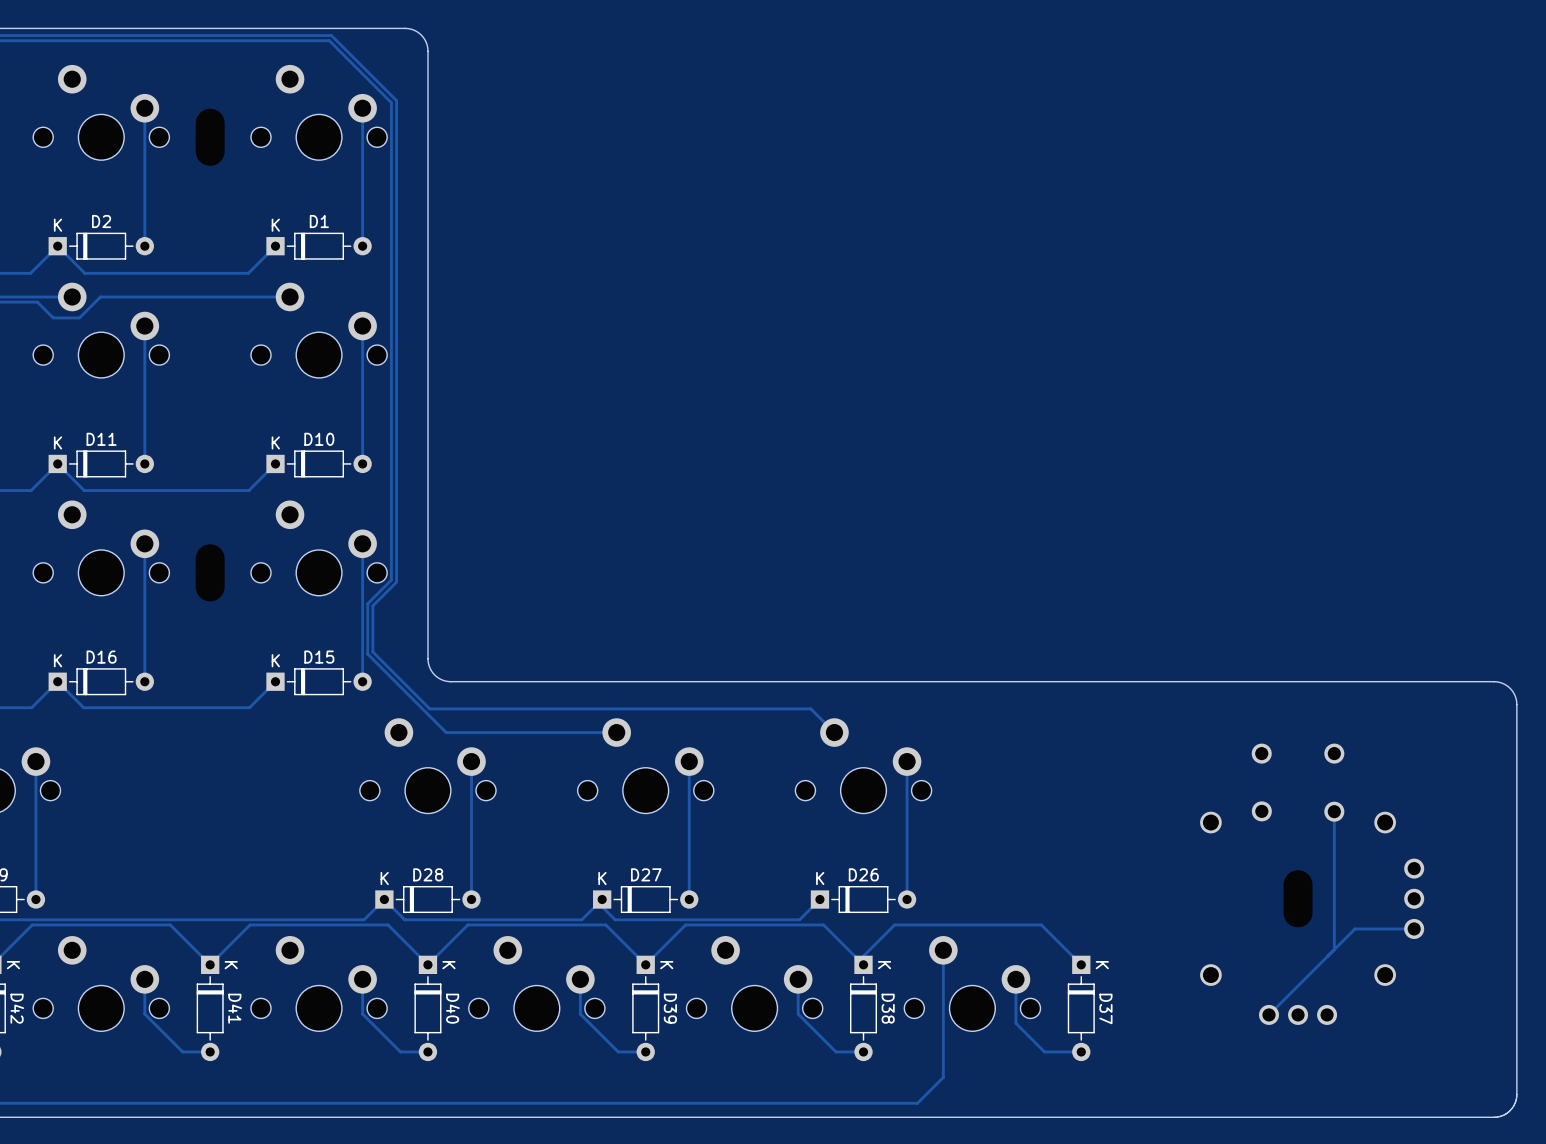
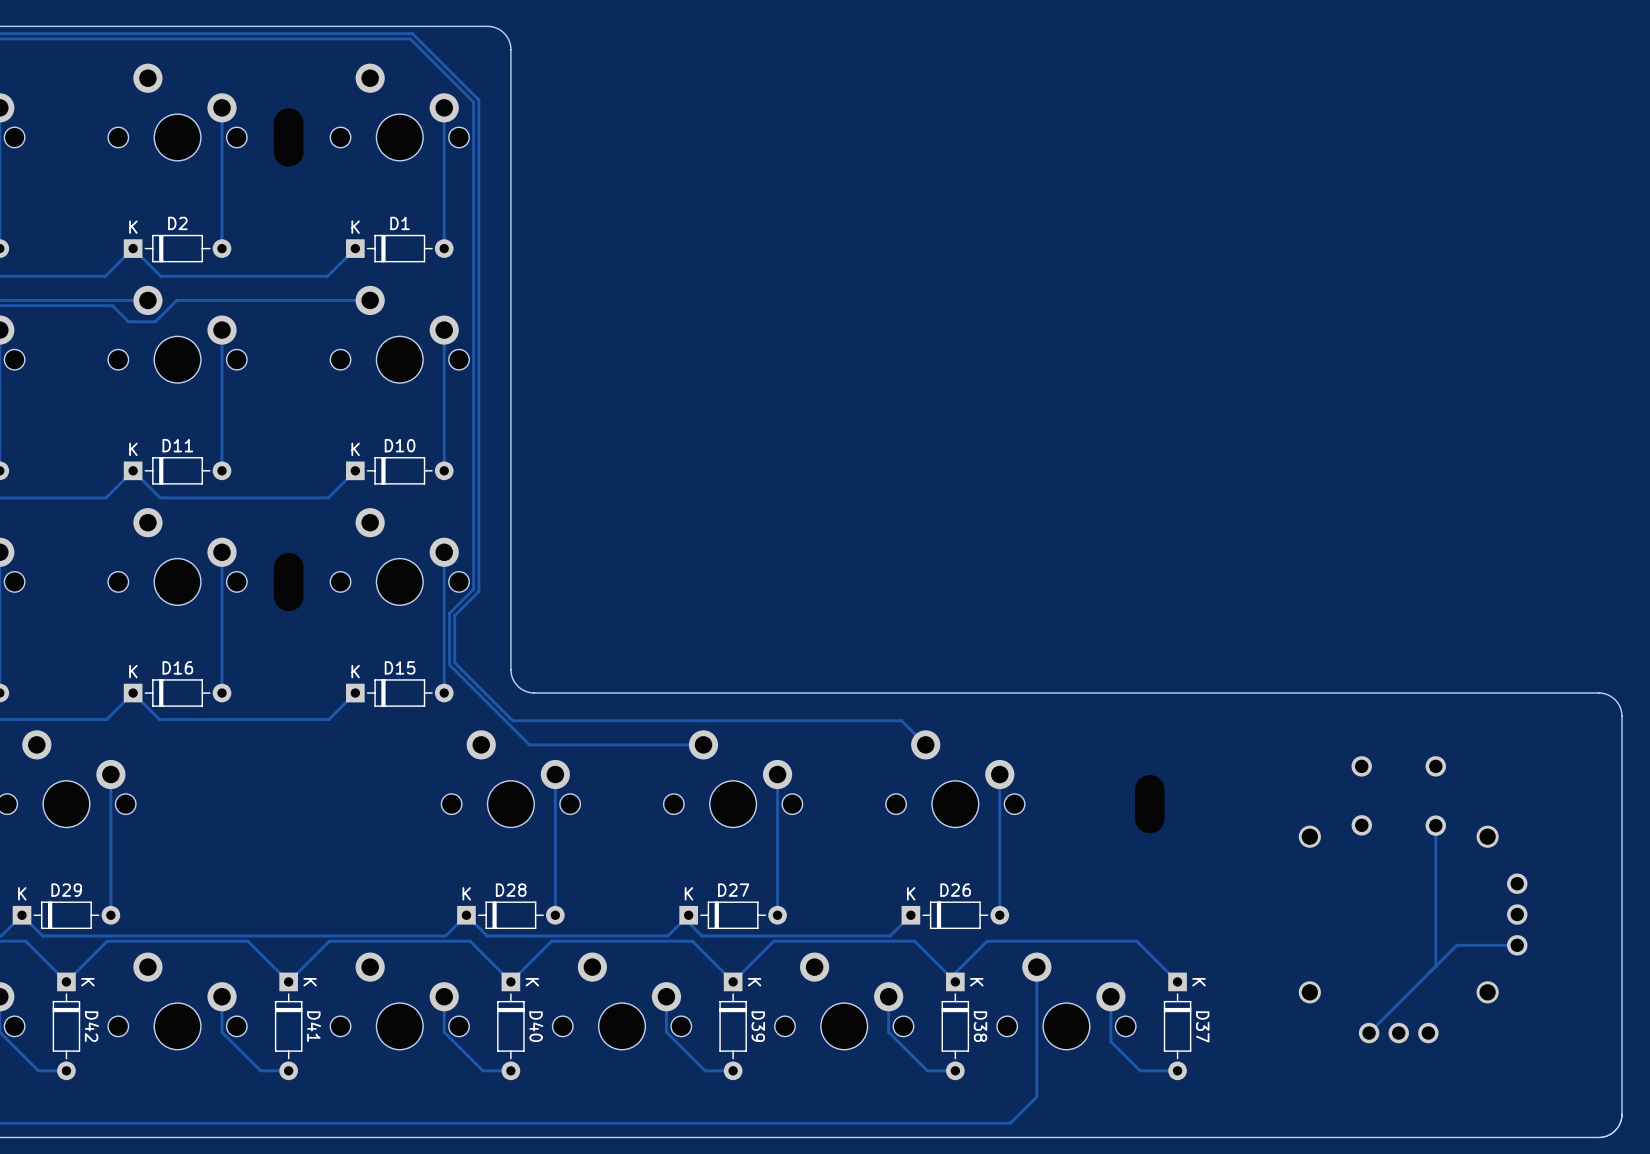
part position: (1298, 898) -> (1149, 804)

